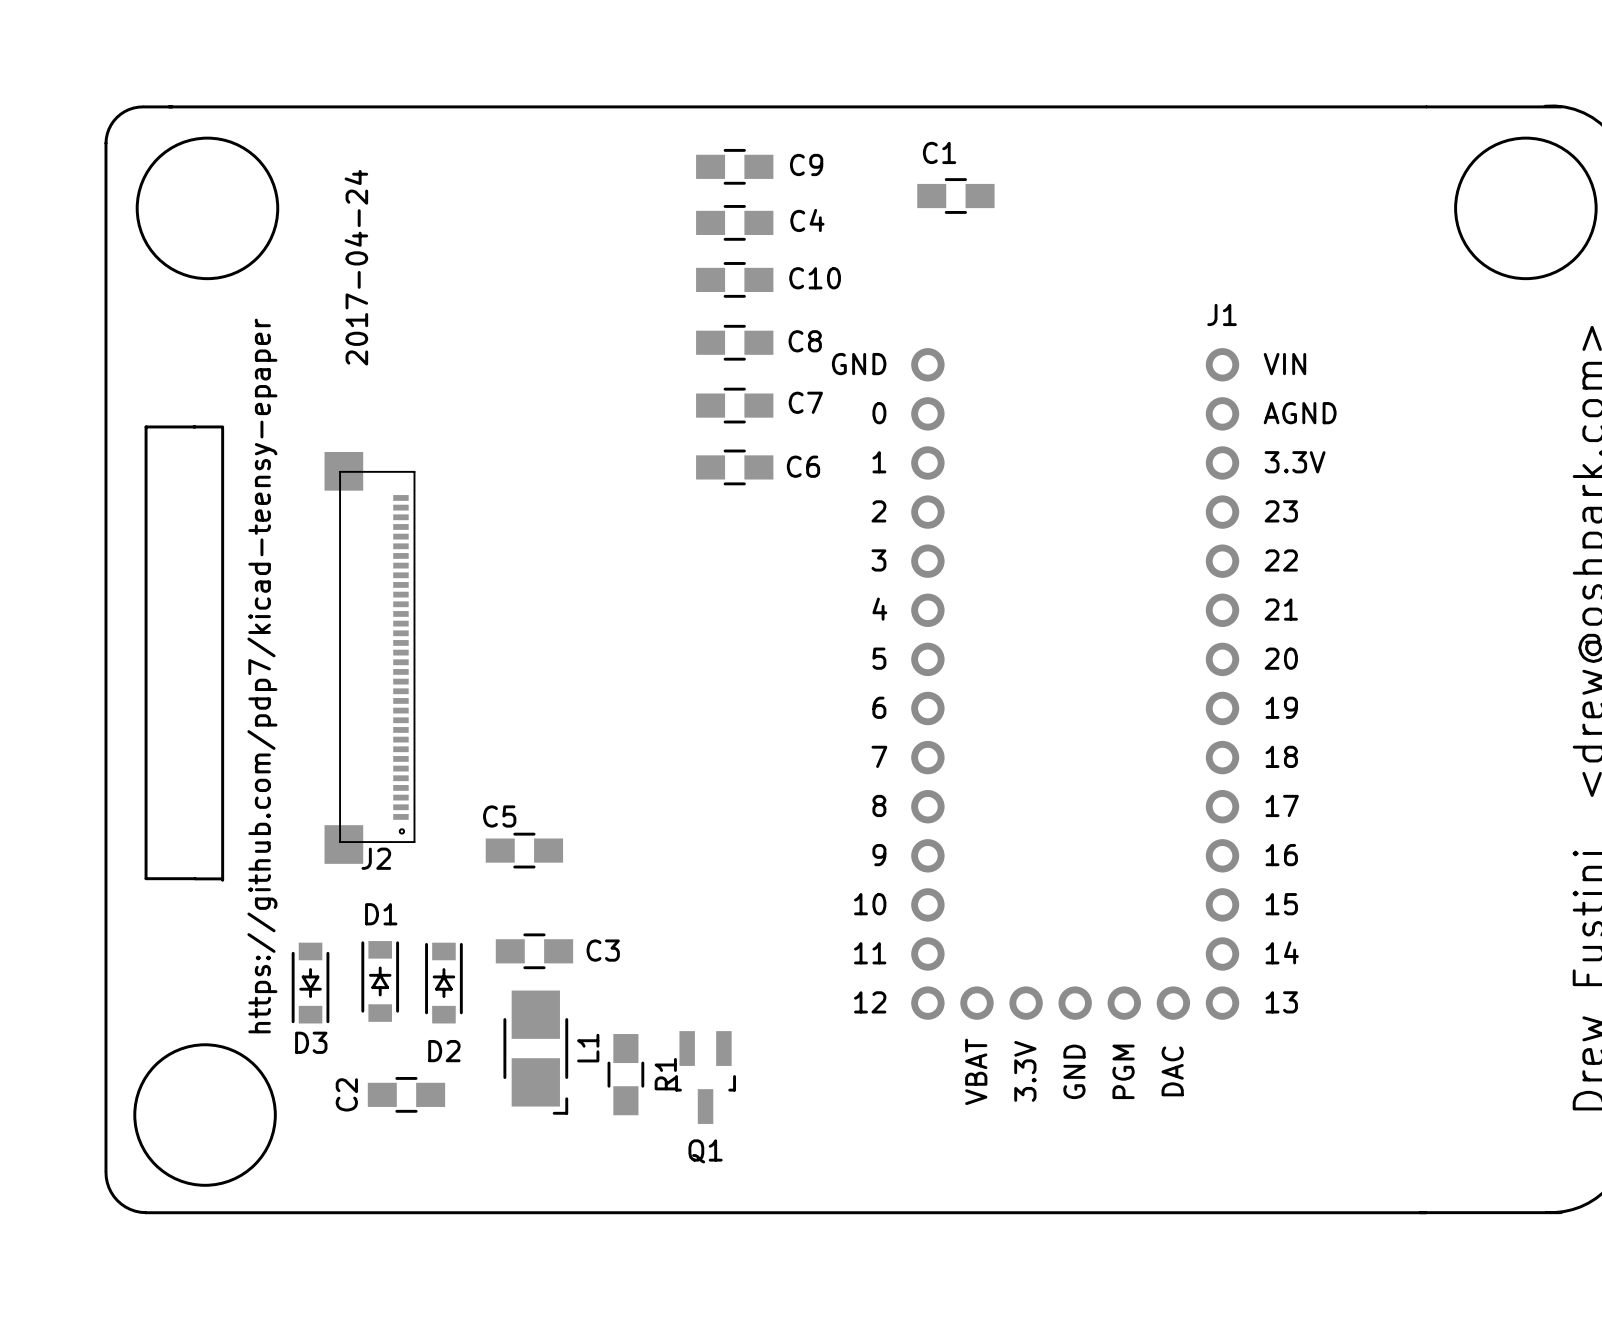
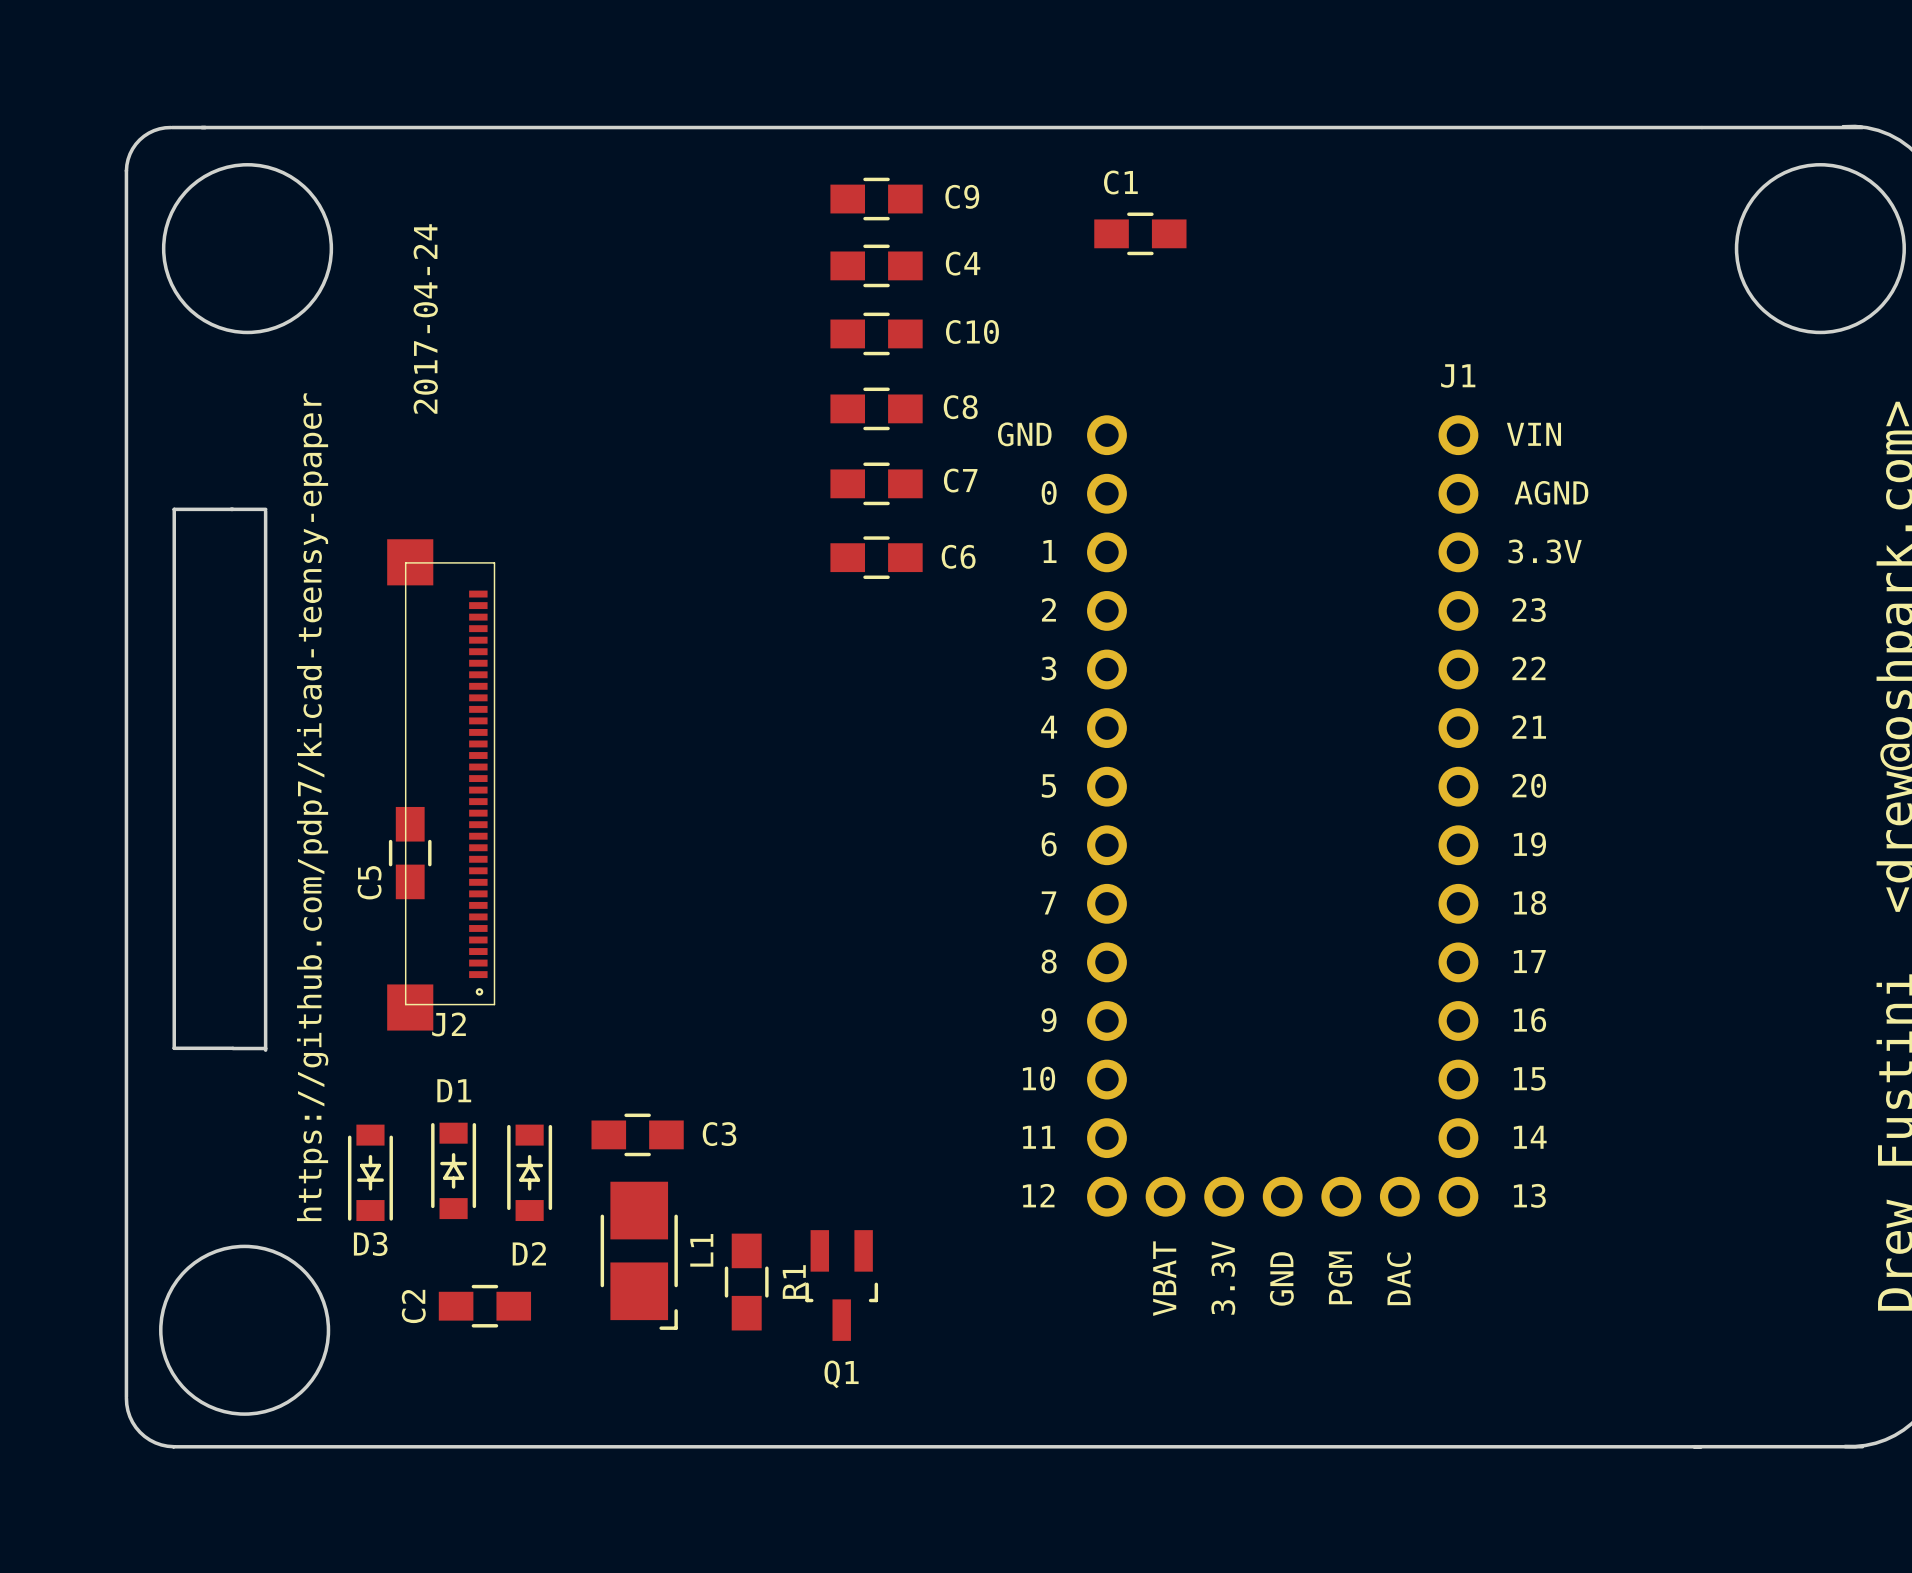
C5 name position: C5 (499, 816) -> C5 (369, 882)
C5 rotation: 0° (524, 850) -> 90° clockwise (410, 853)
C5 position: (524, 850) -> (410, 853)

